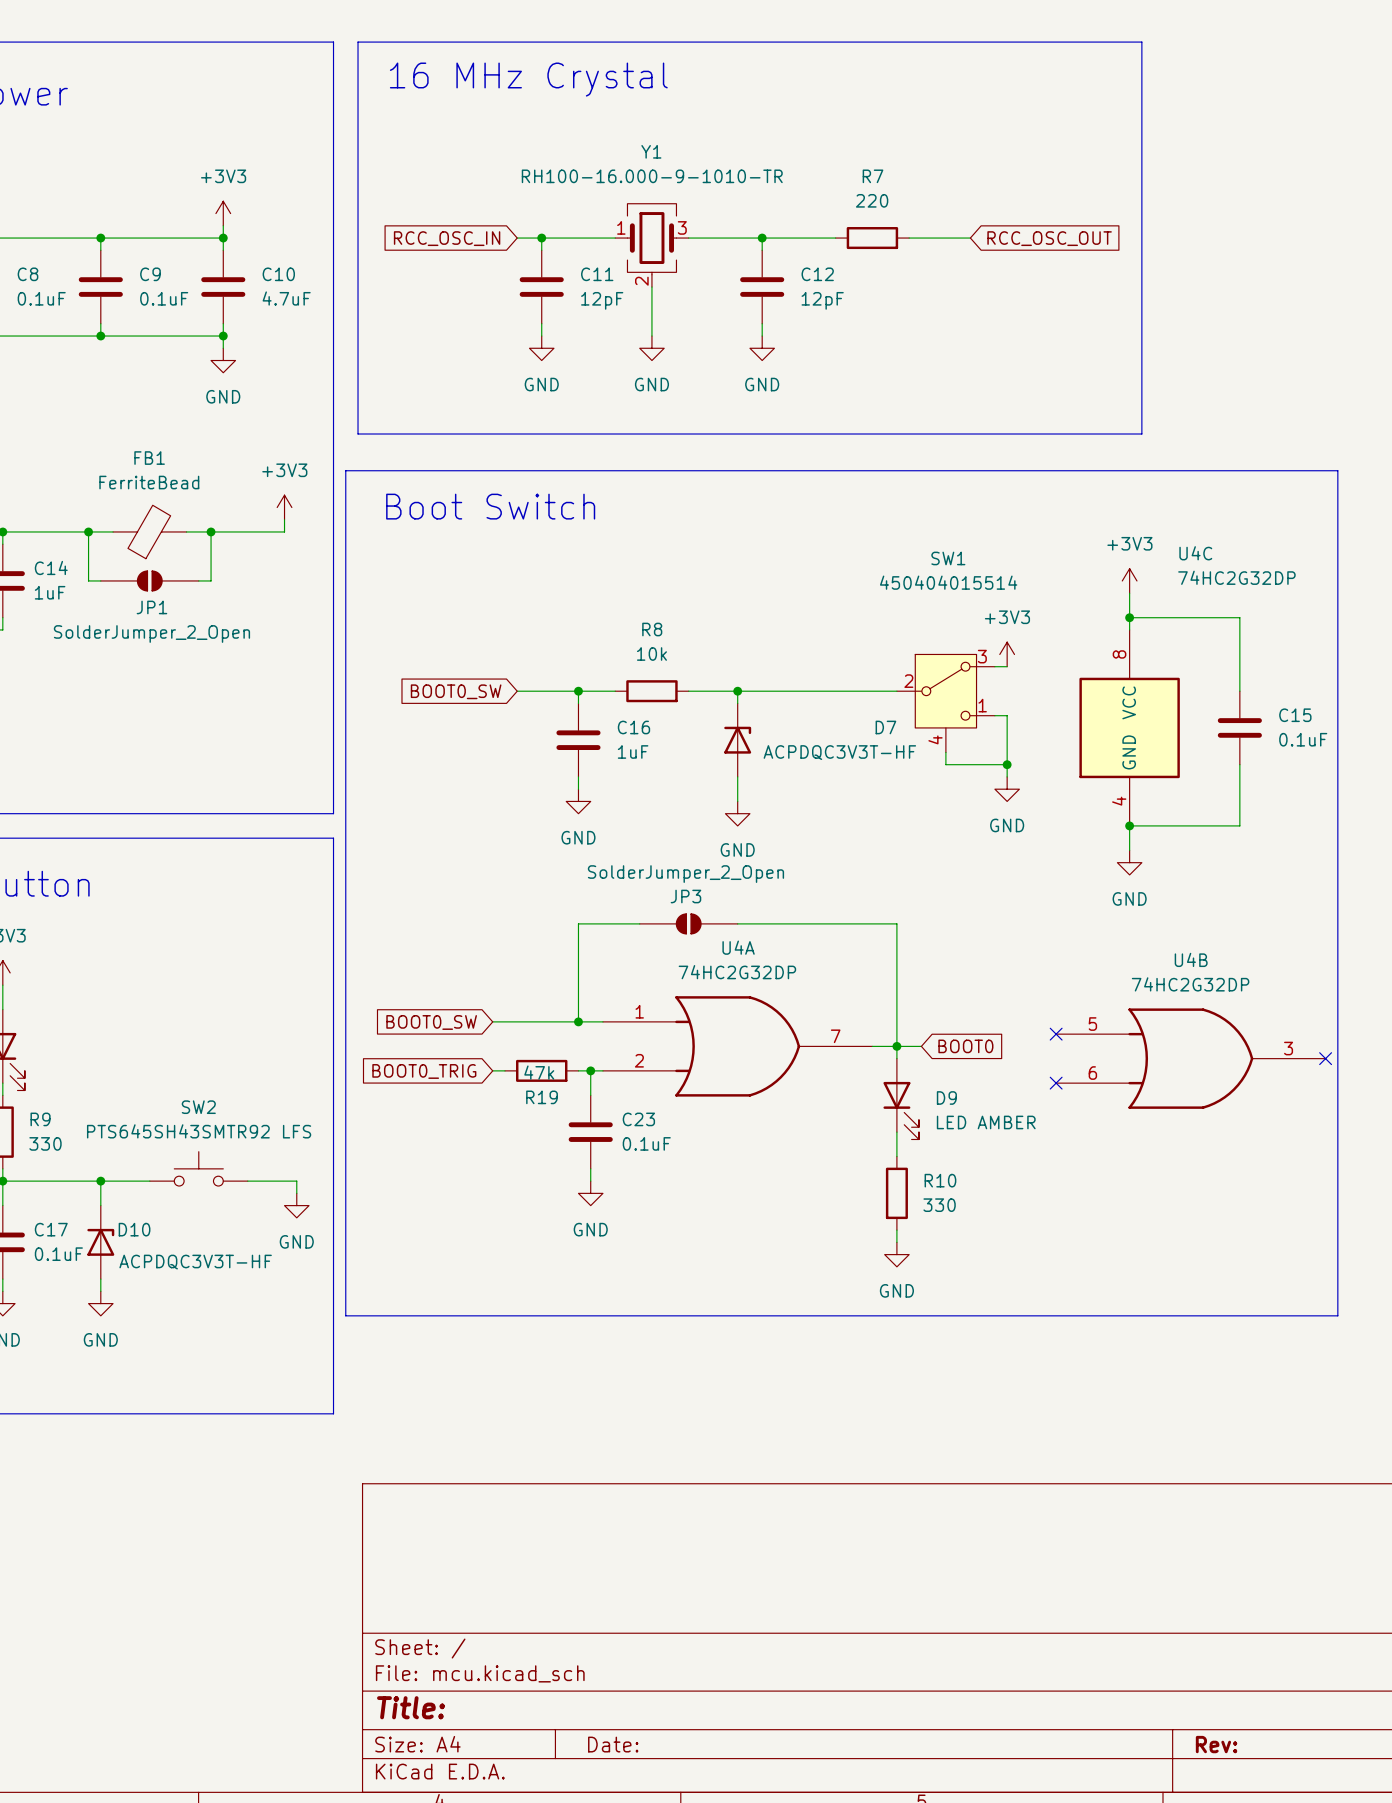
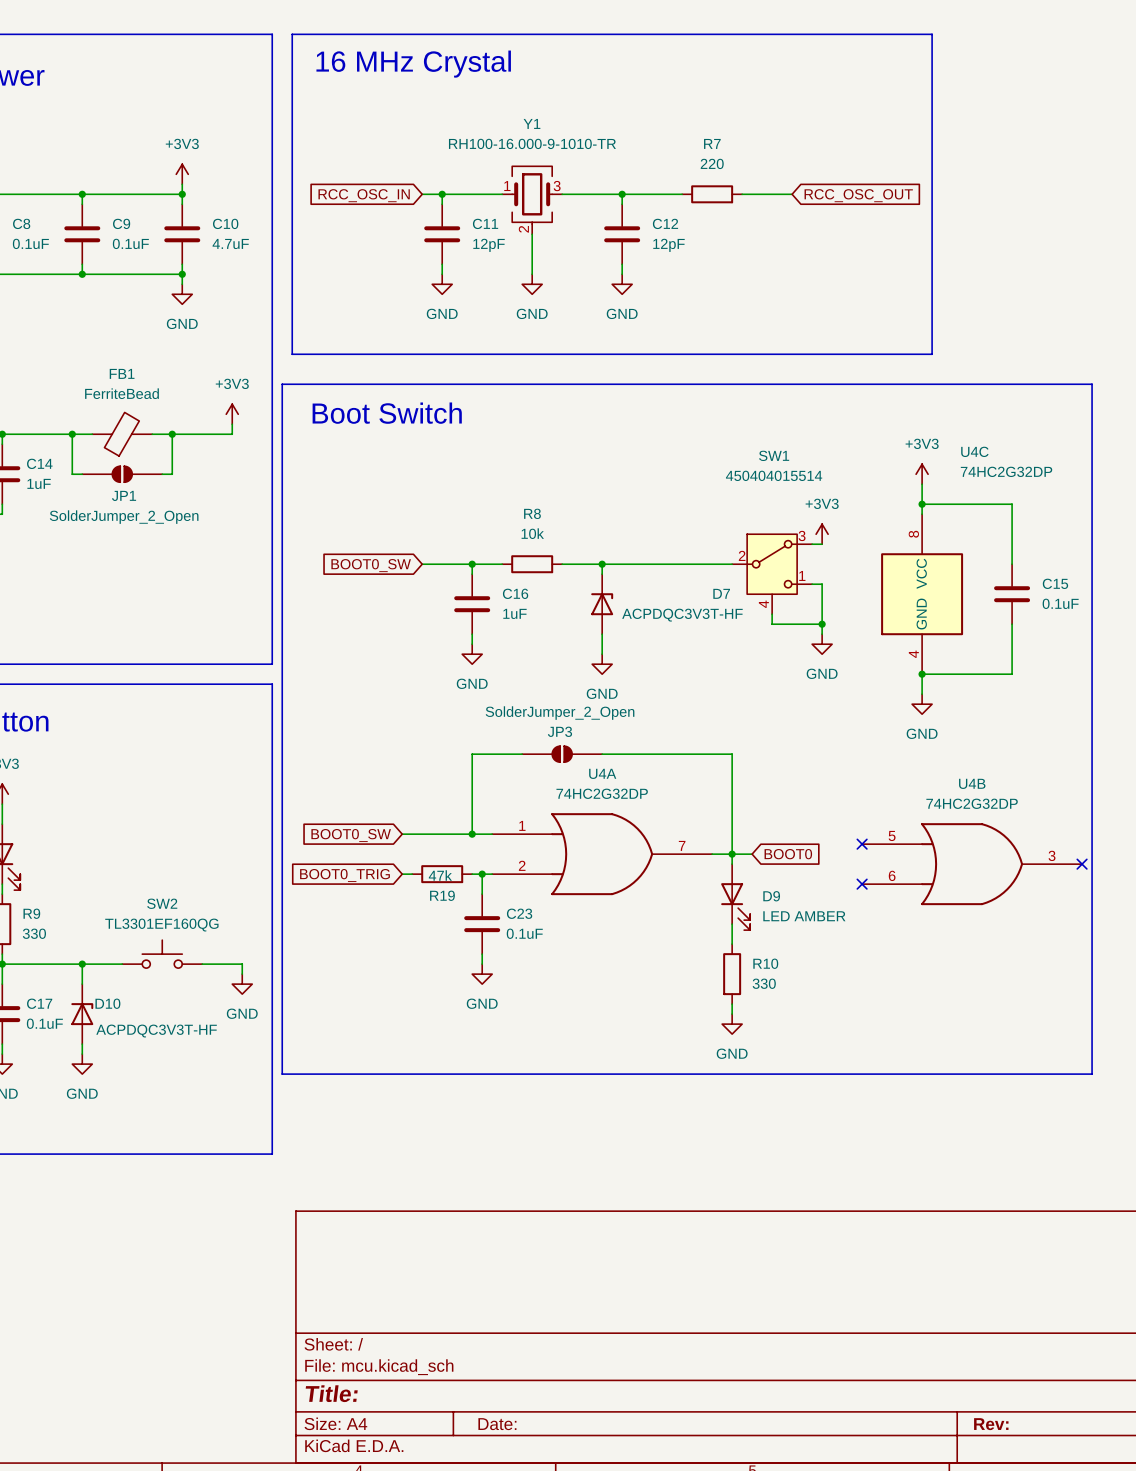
SW2 value: PTS645SH43SMTR92 LFS (199, 1131) -> TL3301EF160QG (161, 925)

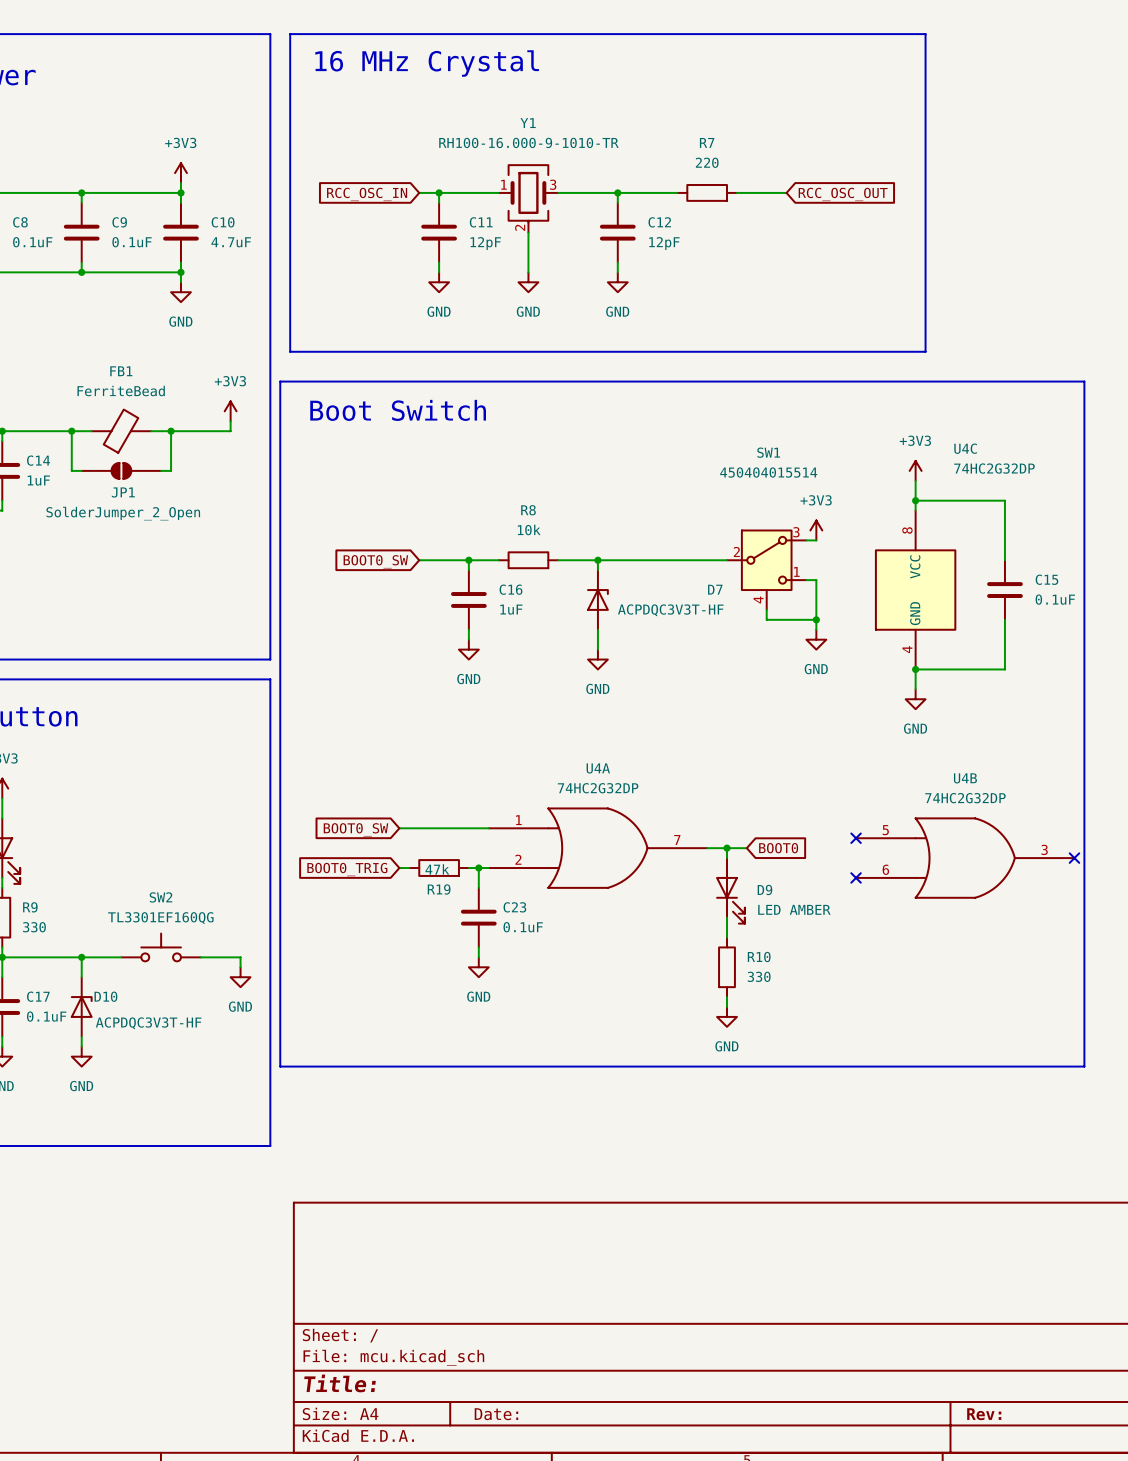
wire: (522, 754) (472, 754) (472, 834) -> none
JP3: SolderJumper_2_Open (562, 754) -> none
wire: (602, 754) (732, 754) (732, 854) -> none
junction: (472, 834) -> none

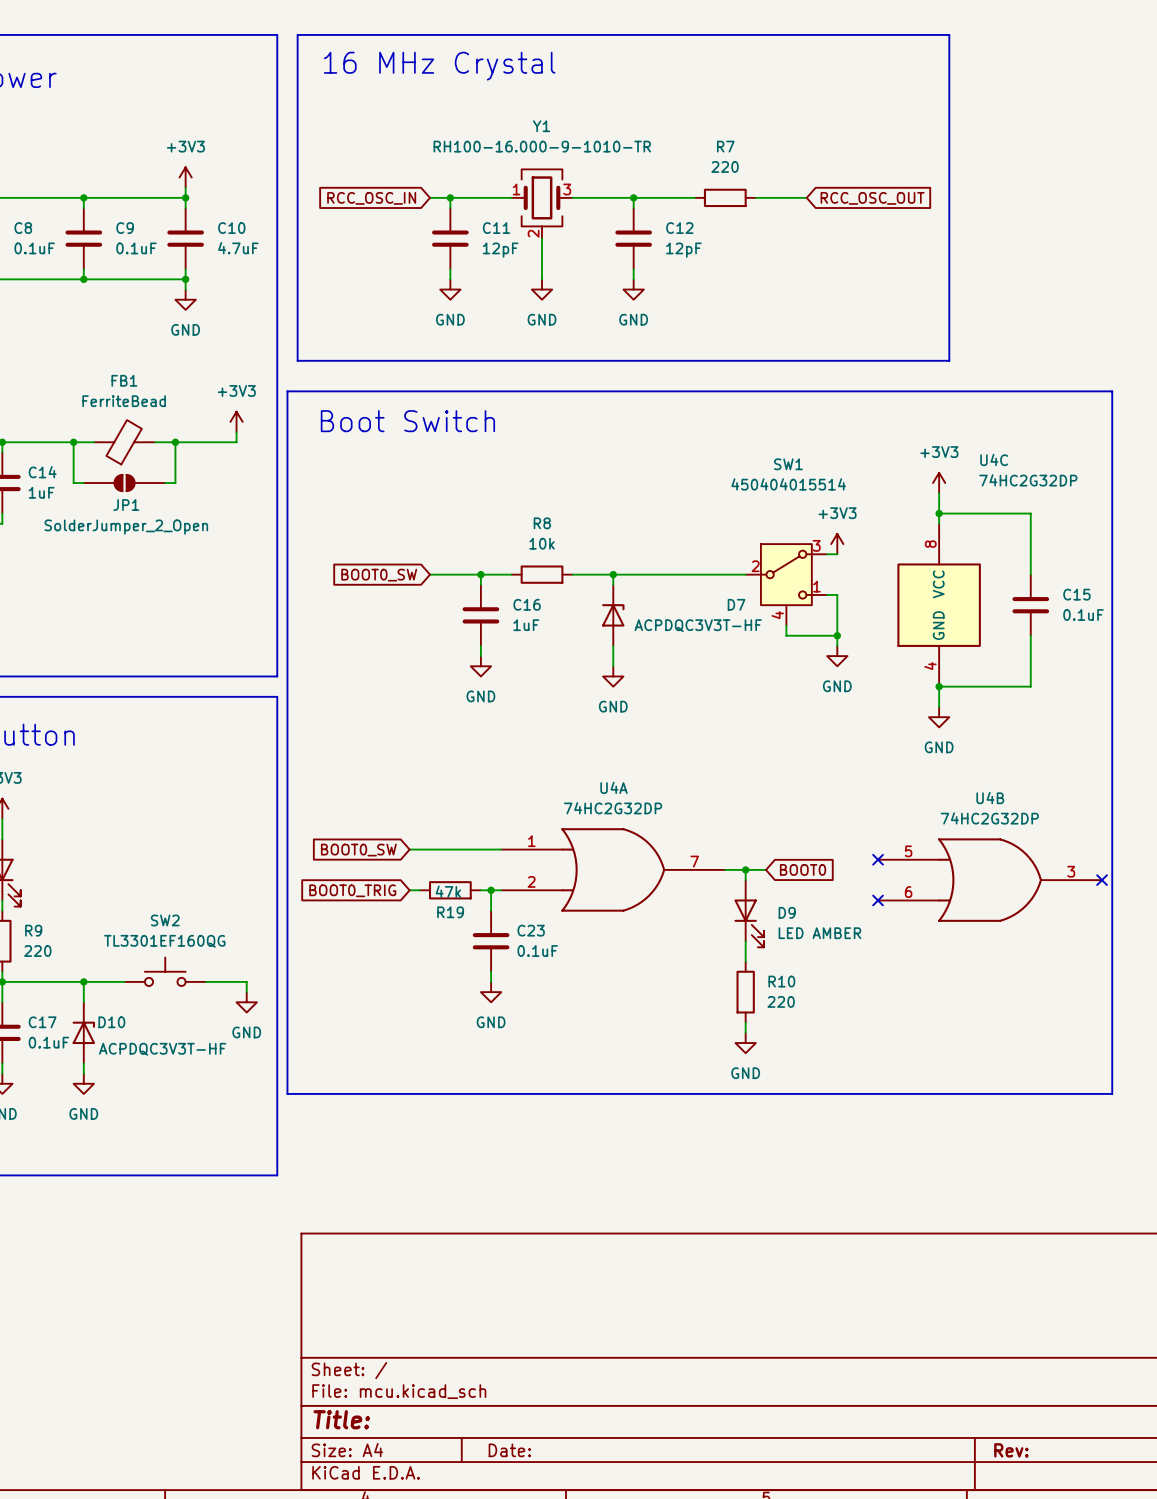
R9 value: 330 (34, 927) -> 220 (37, 951)
R10 value: 330 (759, 976) -> 220 (781, 1001)

